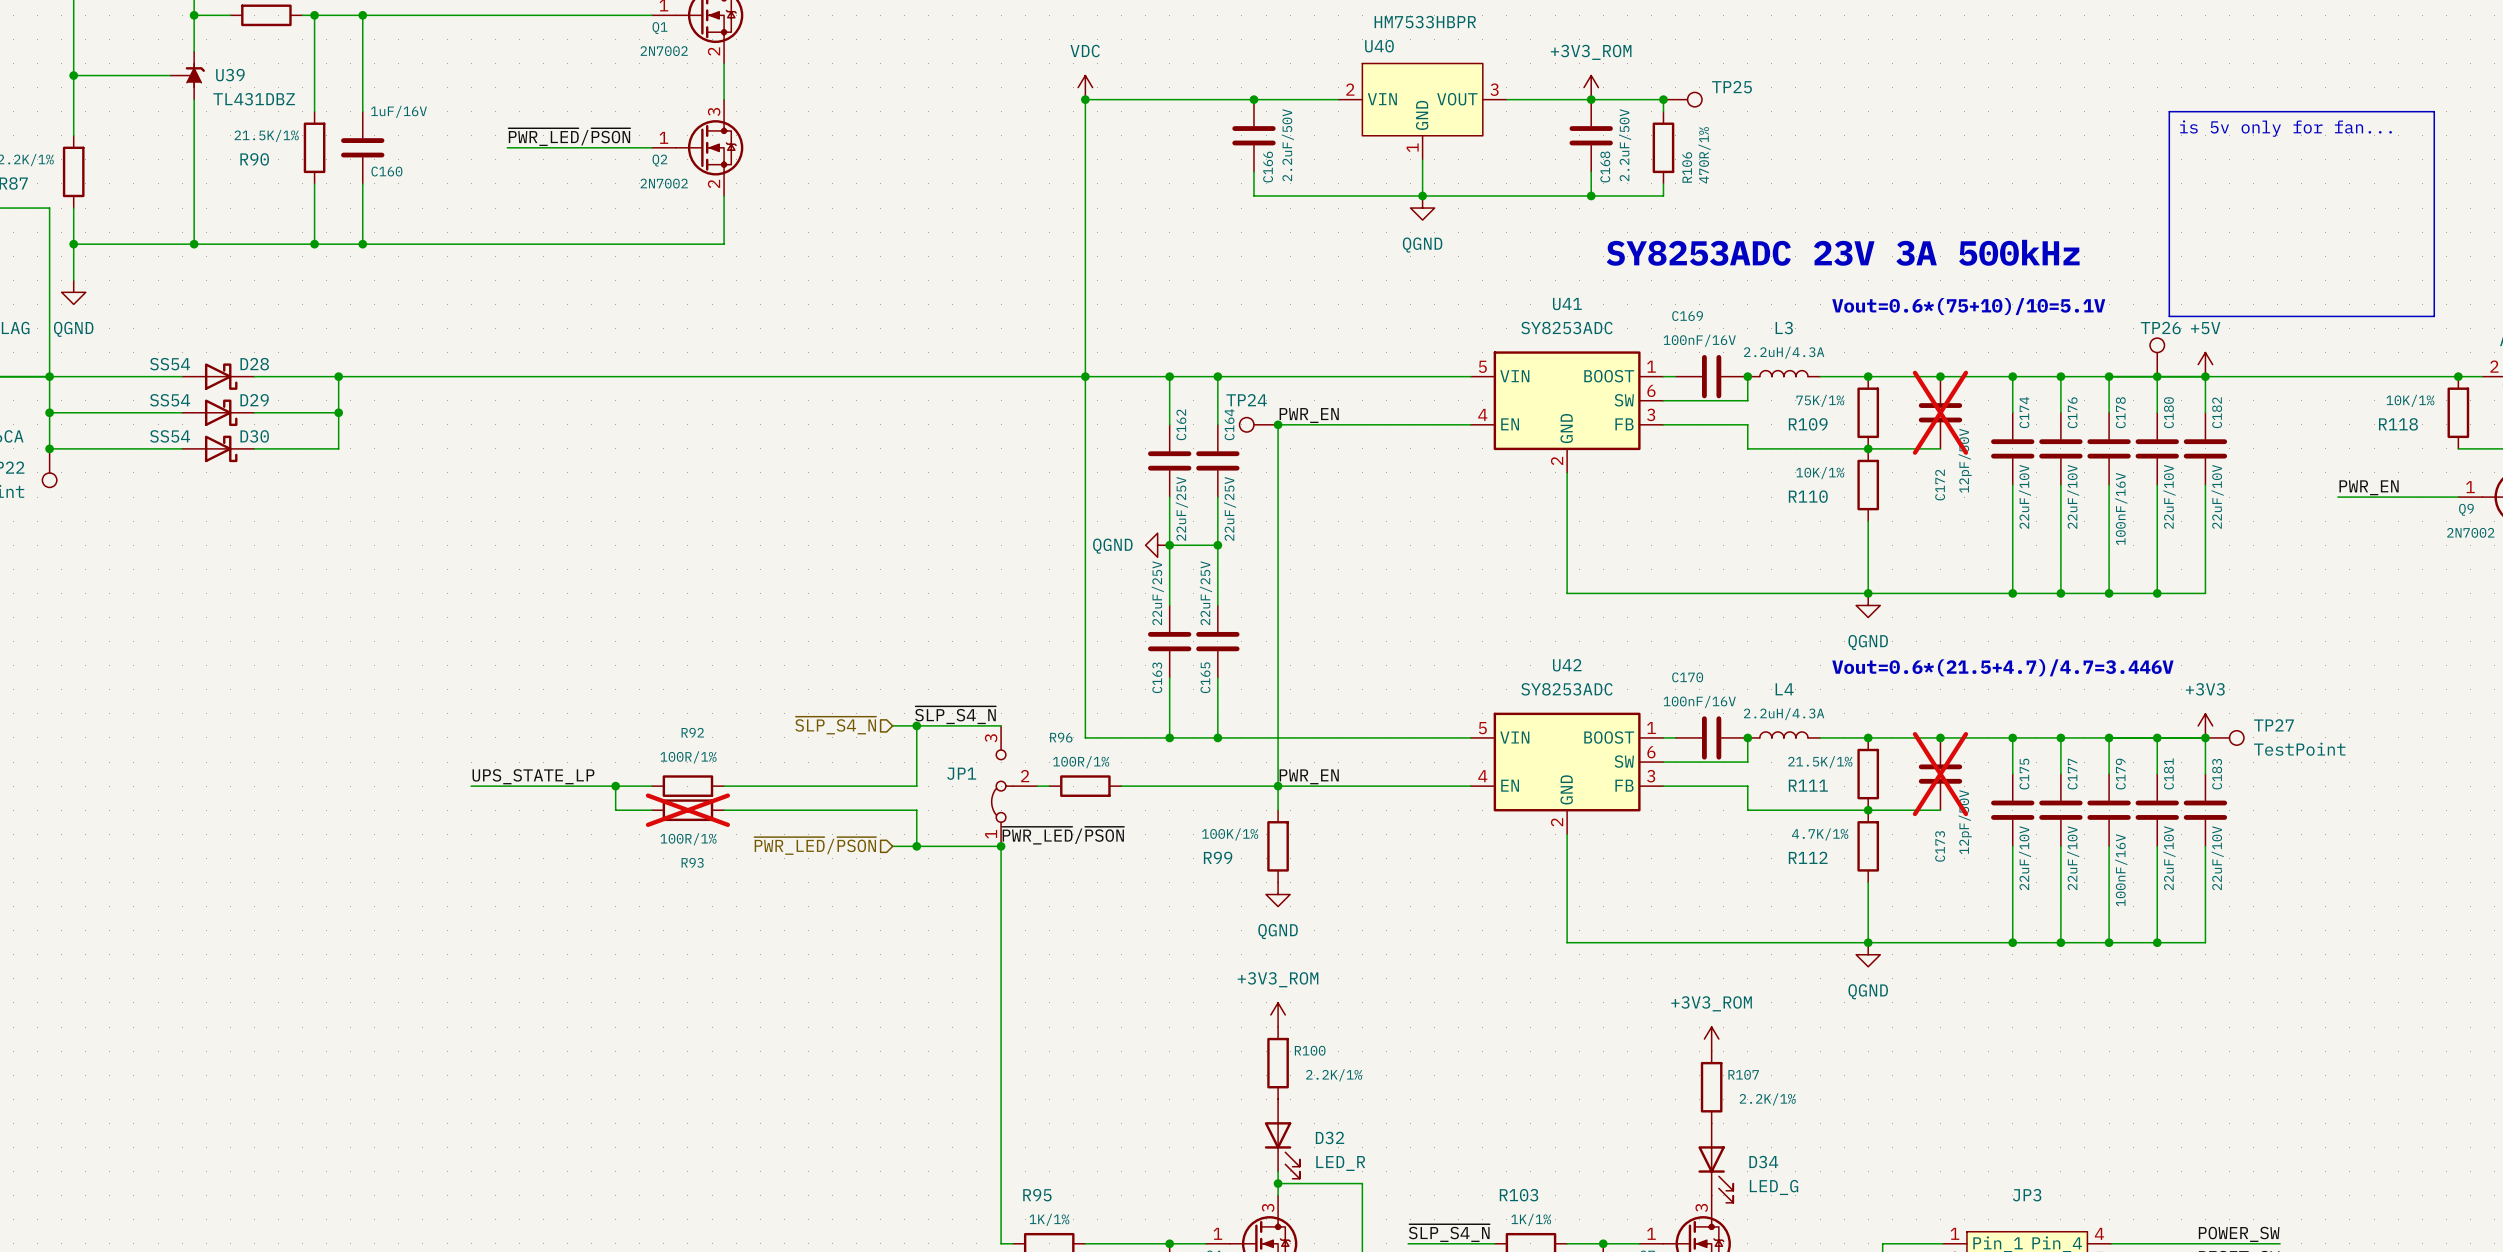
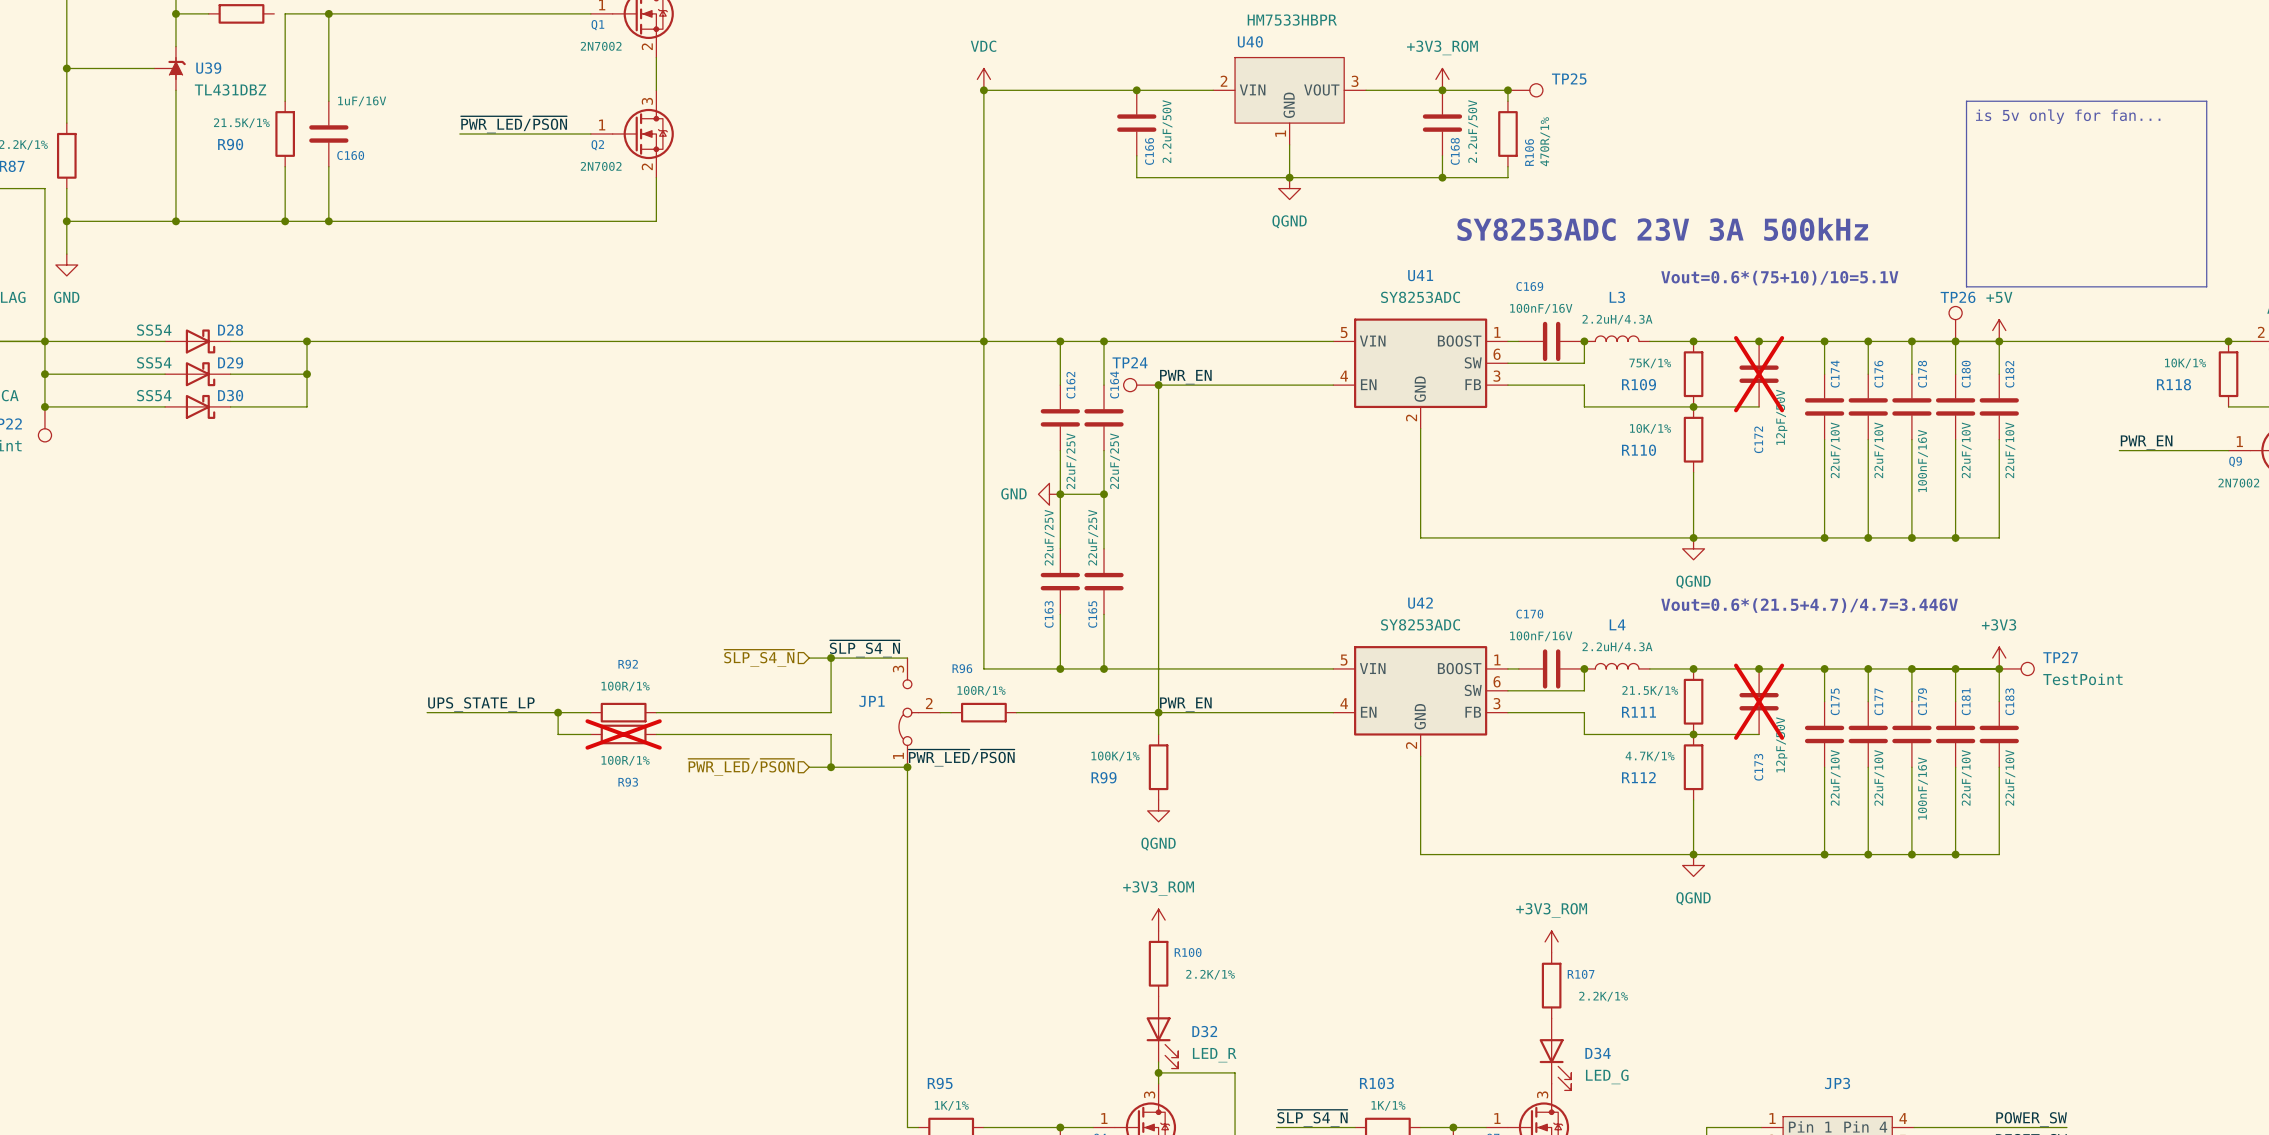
wire: (302, 15) (314, 15) -> none
junction: (314, 15) -> none
power symbol: QGND (73, 292) -> GND (66, 265)
power symbol: QGND (1157, 545) -> GND (1049, 494)

